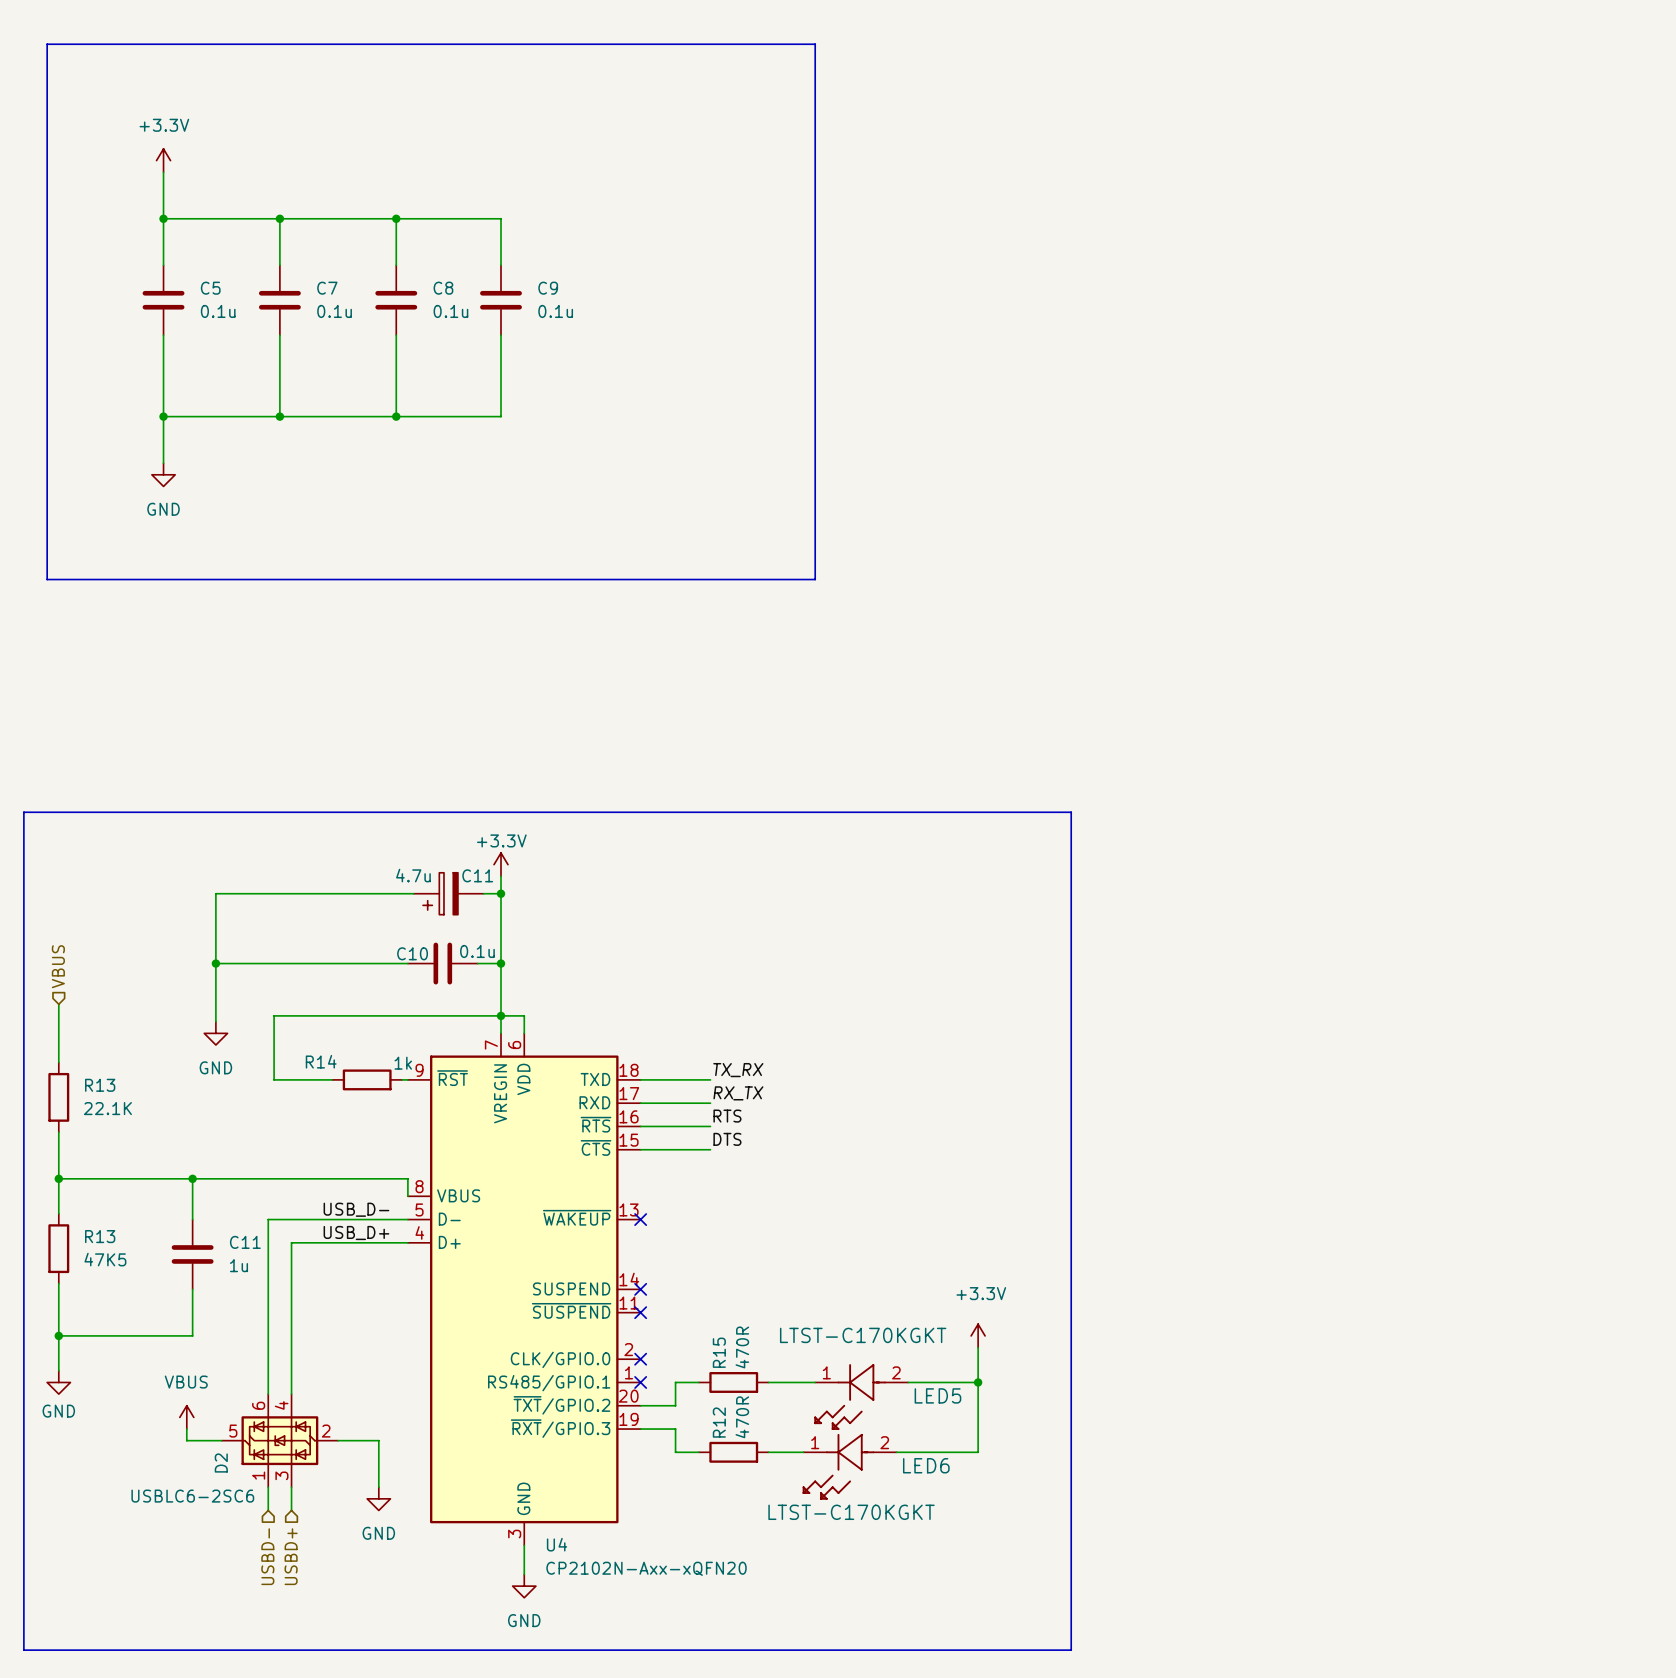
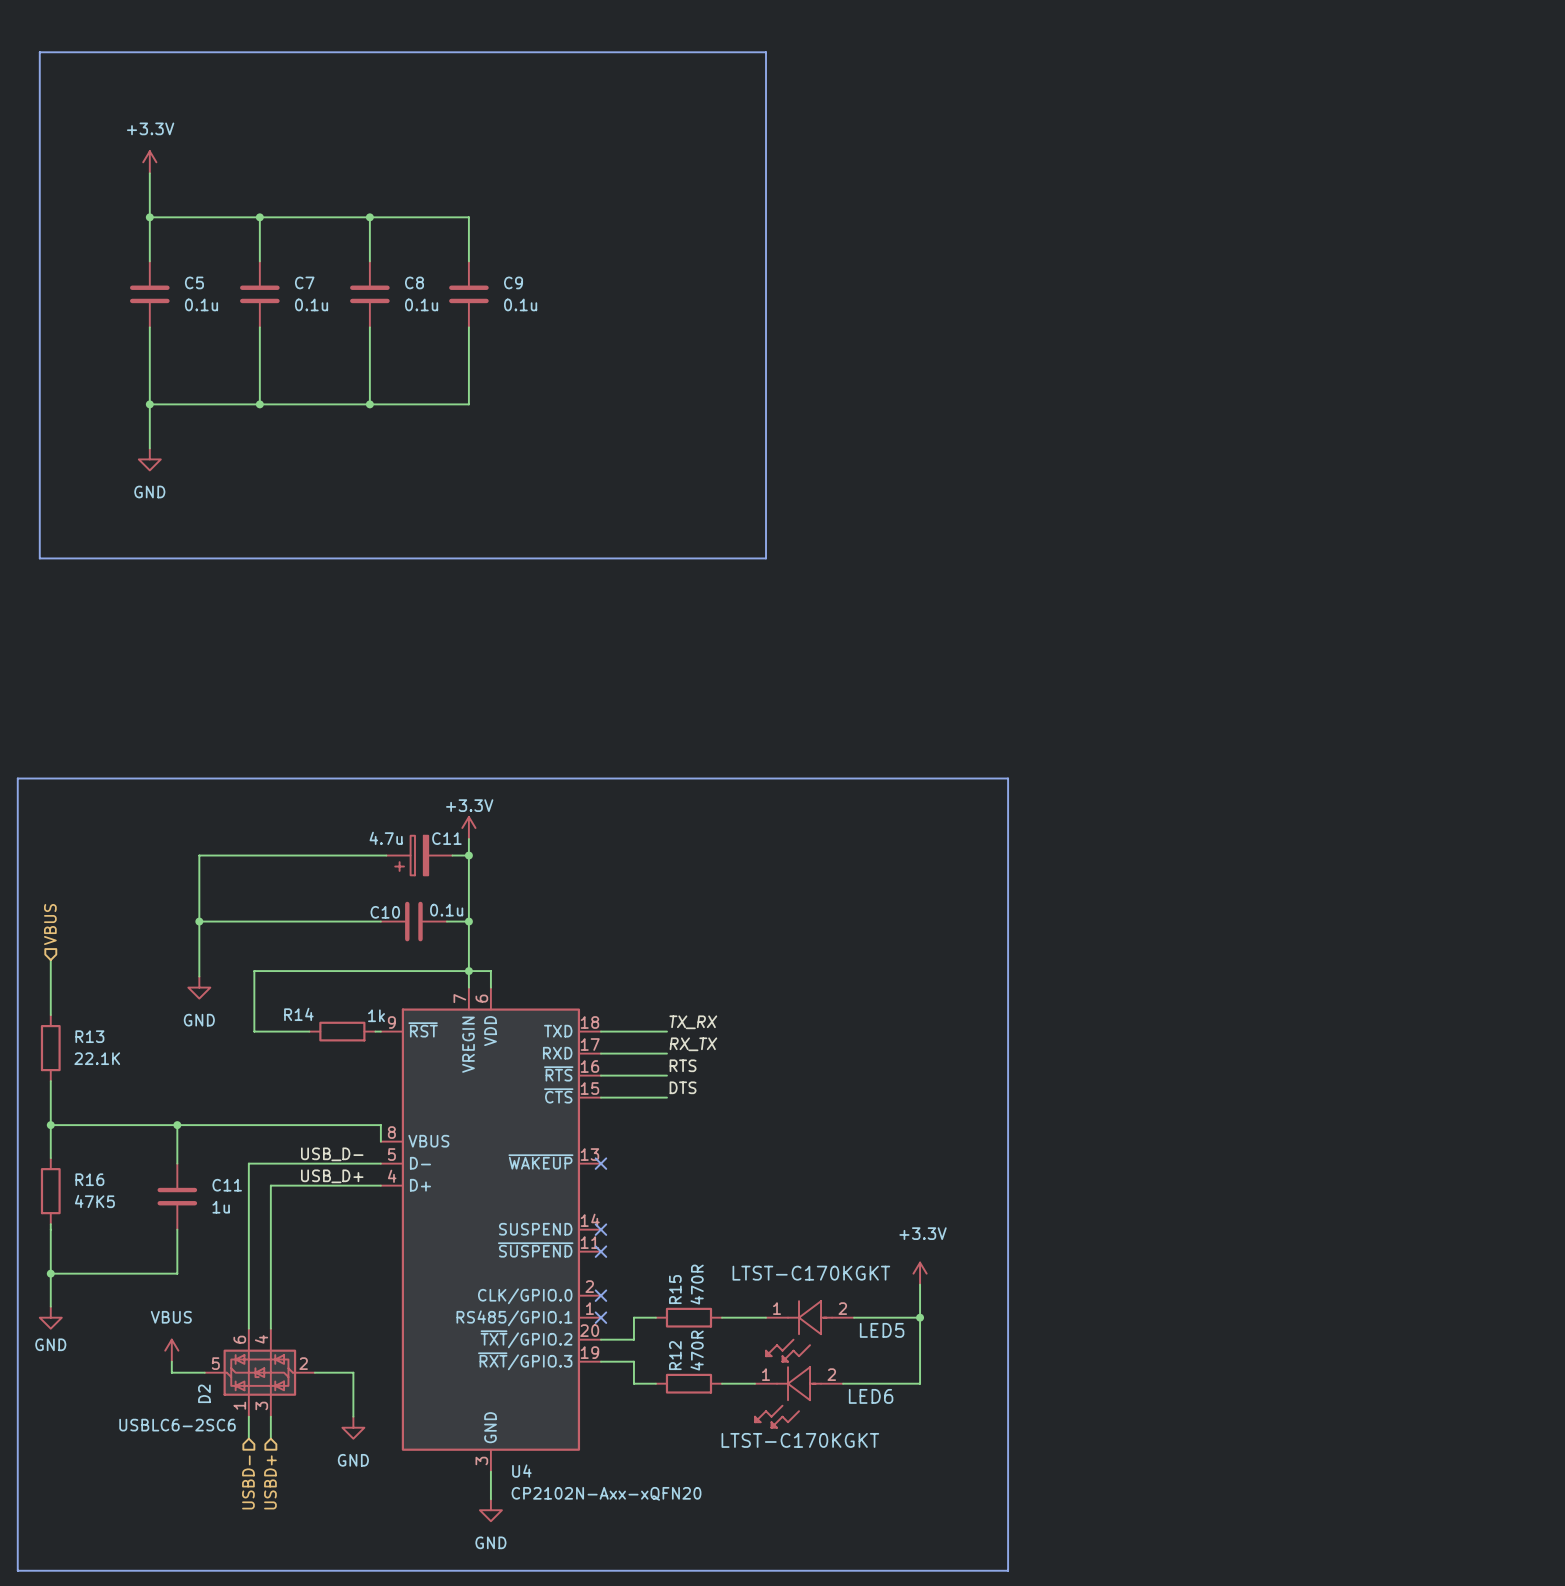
R13 name: R13 (100, 1236) -> R16 (89, 1179)

